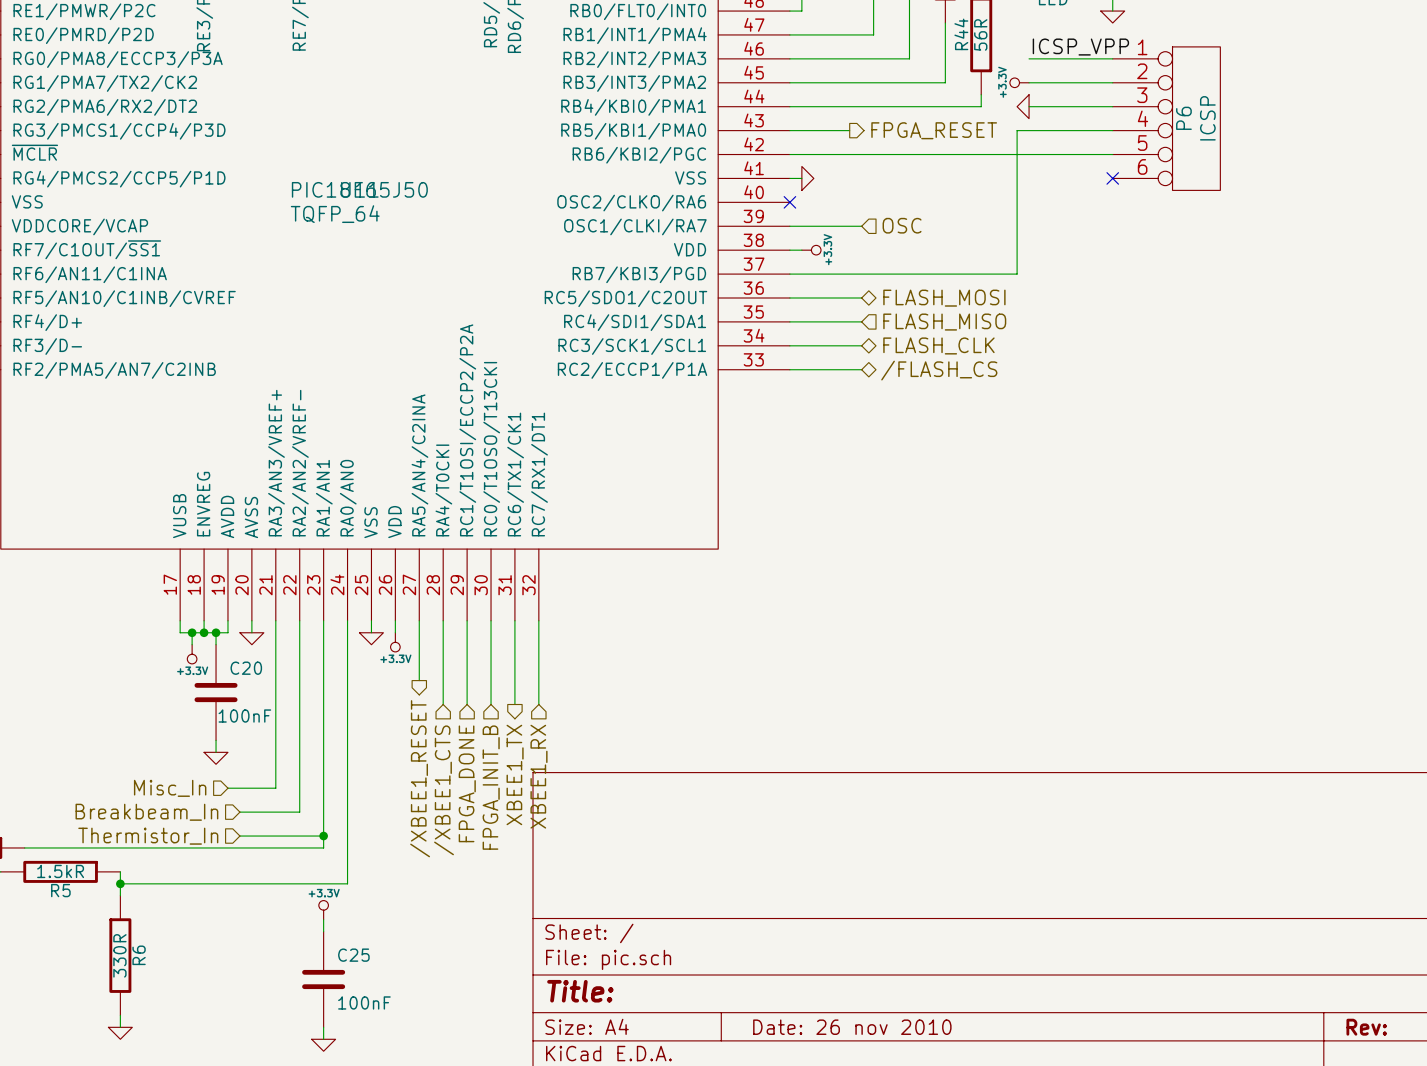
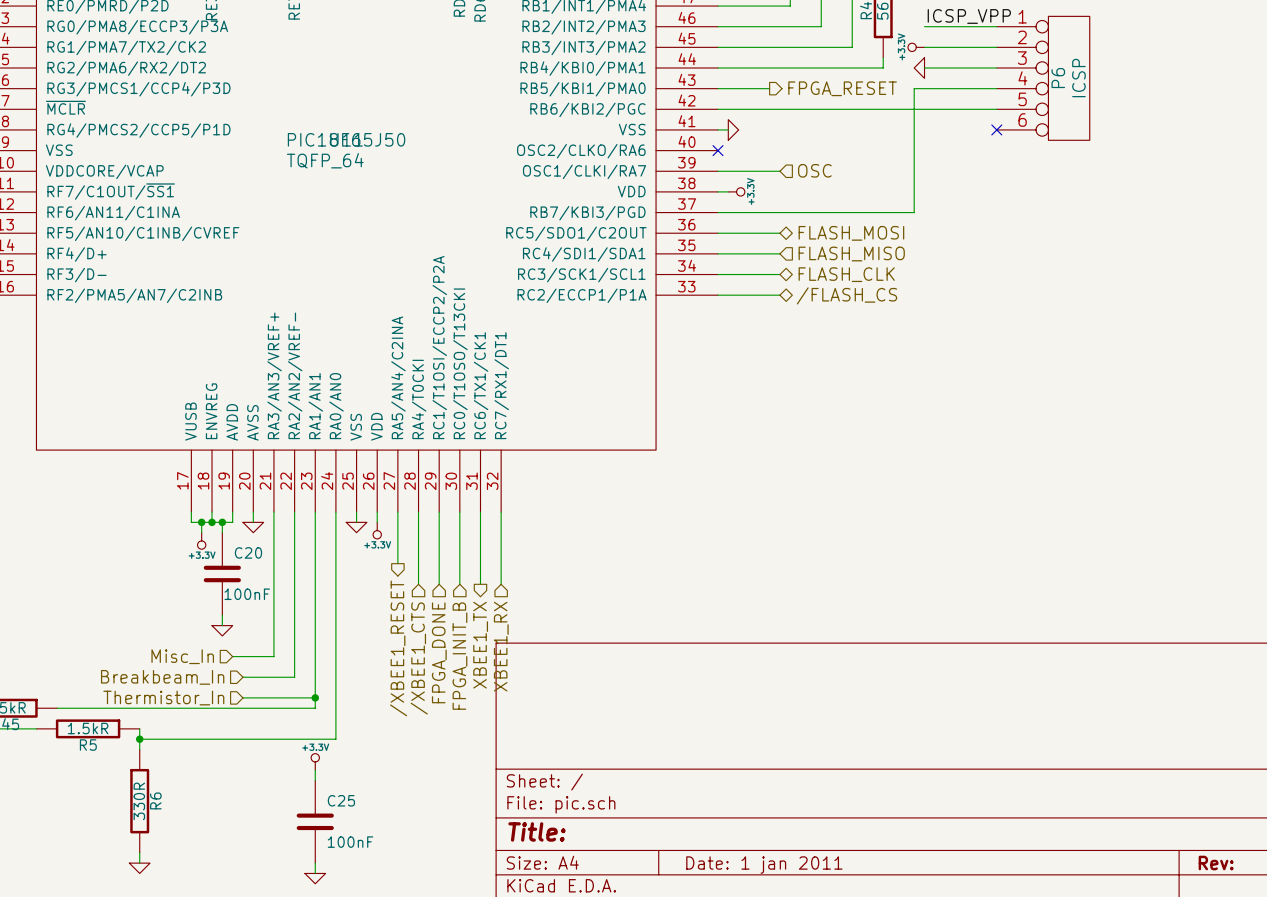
title block: Date: 26 nov 2010 (852, 1027) -> Date: 1 jan 2011 (764, 865)

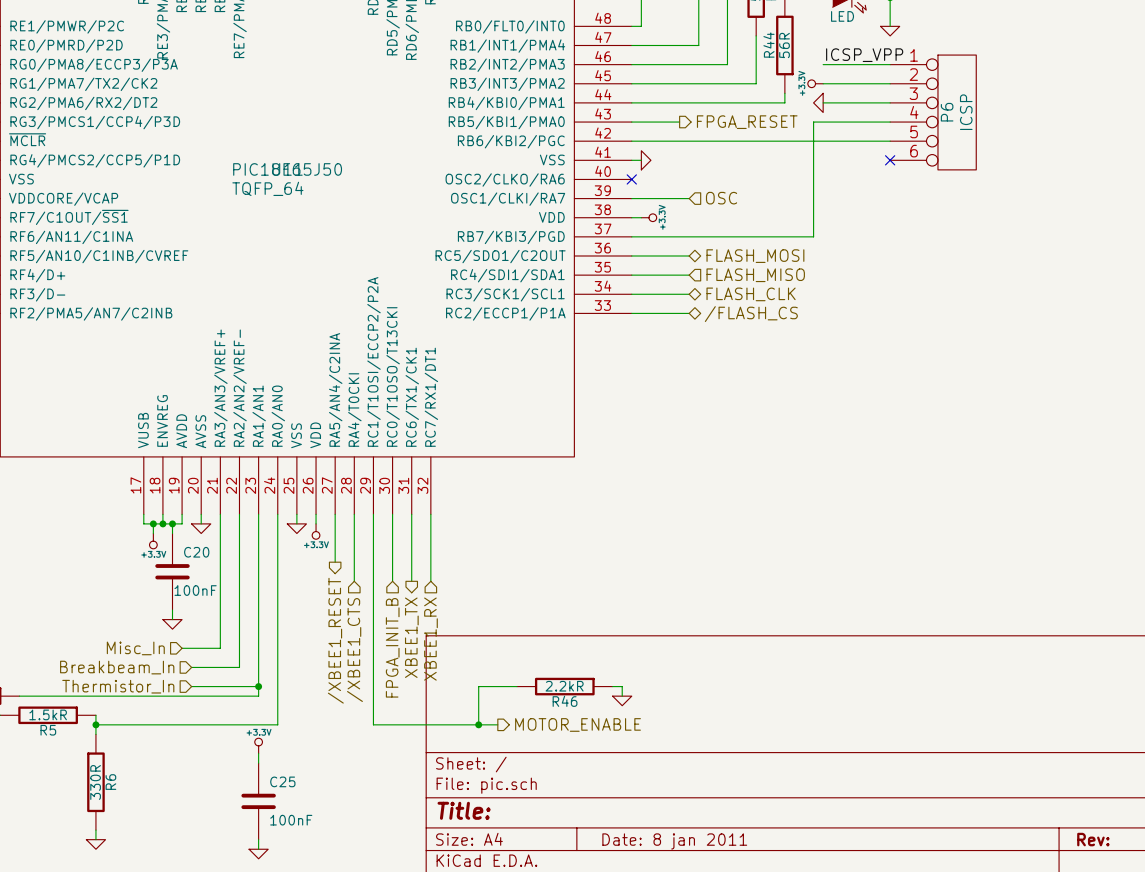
wire: none -> (373, 581) (373, 724) (497, 724)
hierarchical label: FPGA_DONE (439, 652) -> none
wire: none -> (516, 686) (478, 686) (478, 724)
R46: none -> 2.2kR (564, 686)
wire: none -> (612, 686) (622, 686) (622, 696)
power symbol: none -> (622, 700)
junction: none -> (478, 724)
hierarchical label: none -> MOTOR_ENABLE (578, 724)
title block: Date: 1 jan 2011 (764, 865) -> Date: 8 jan 2011 (674, 841)

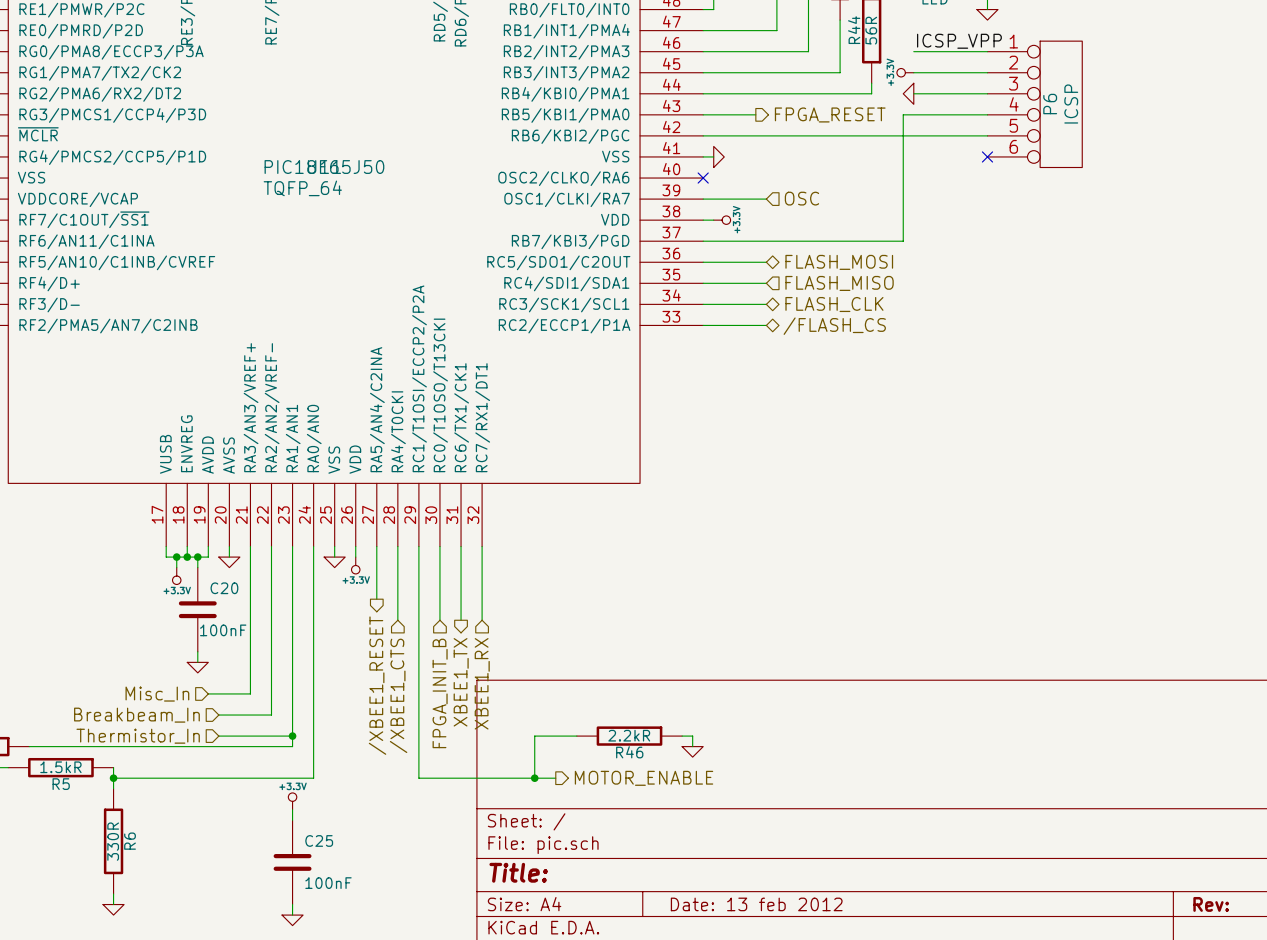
title block: Date: 8 jan 2011 (674, 841) -> Date: 13 feb 2012 (756, 904)

